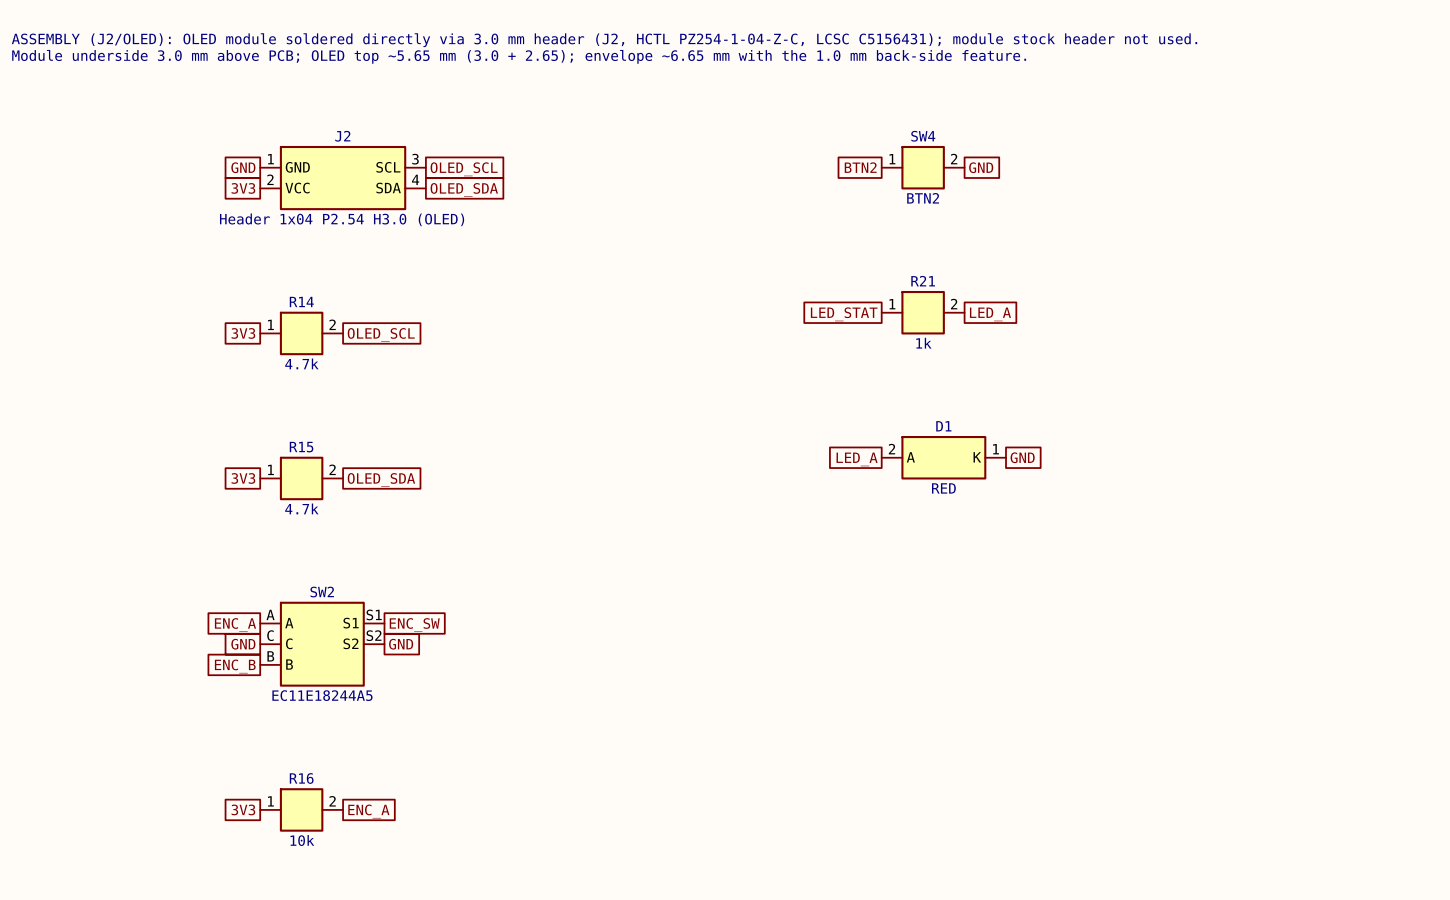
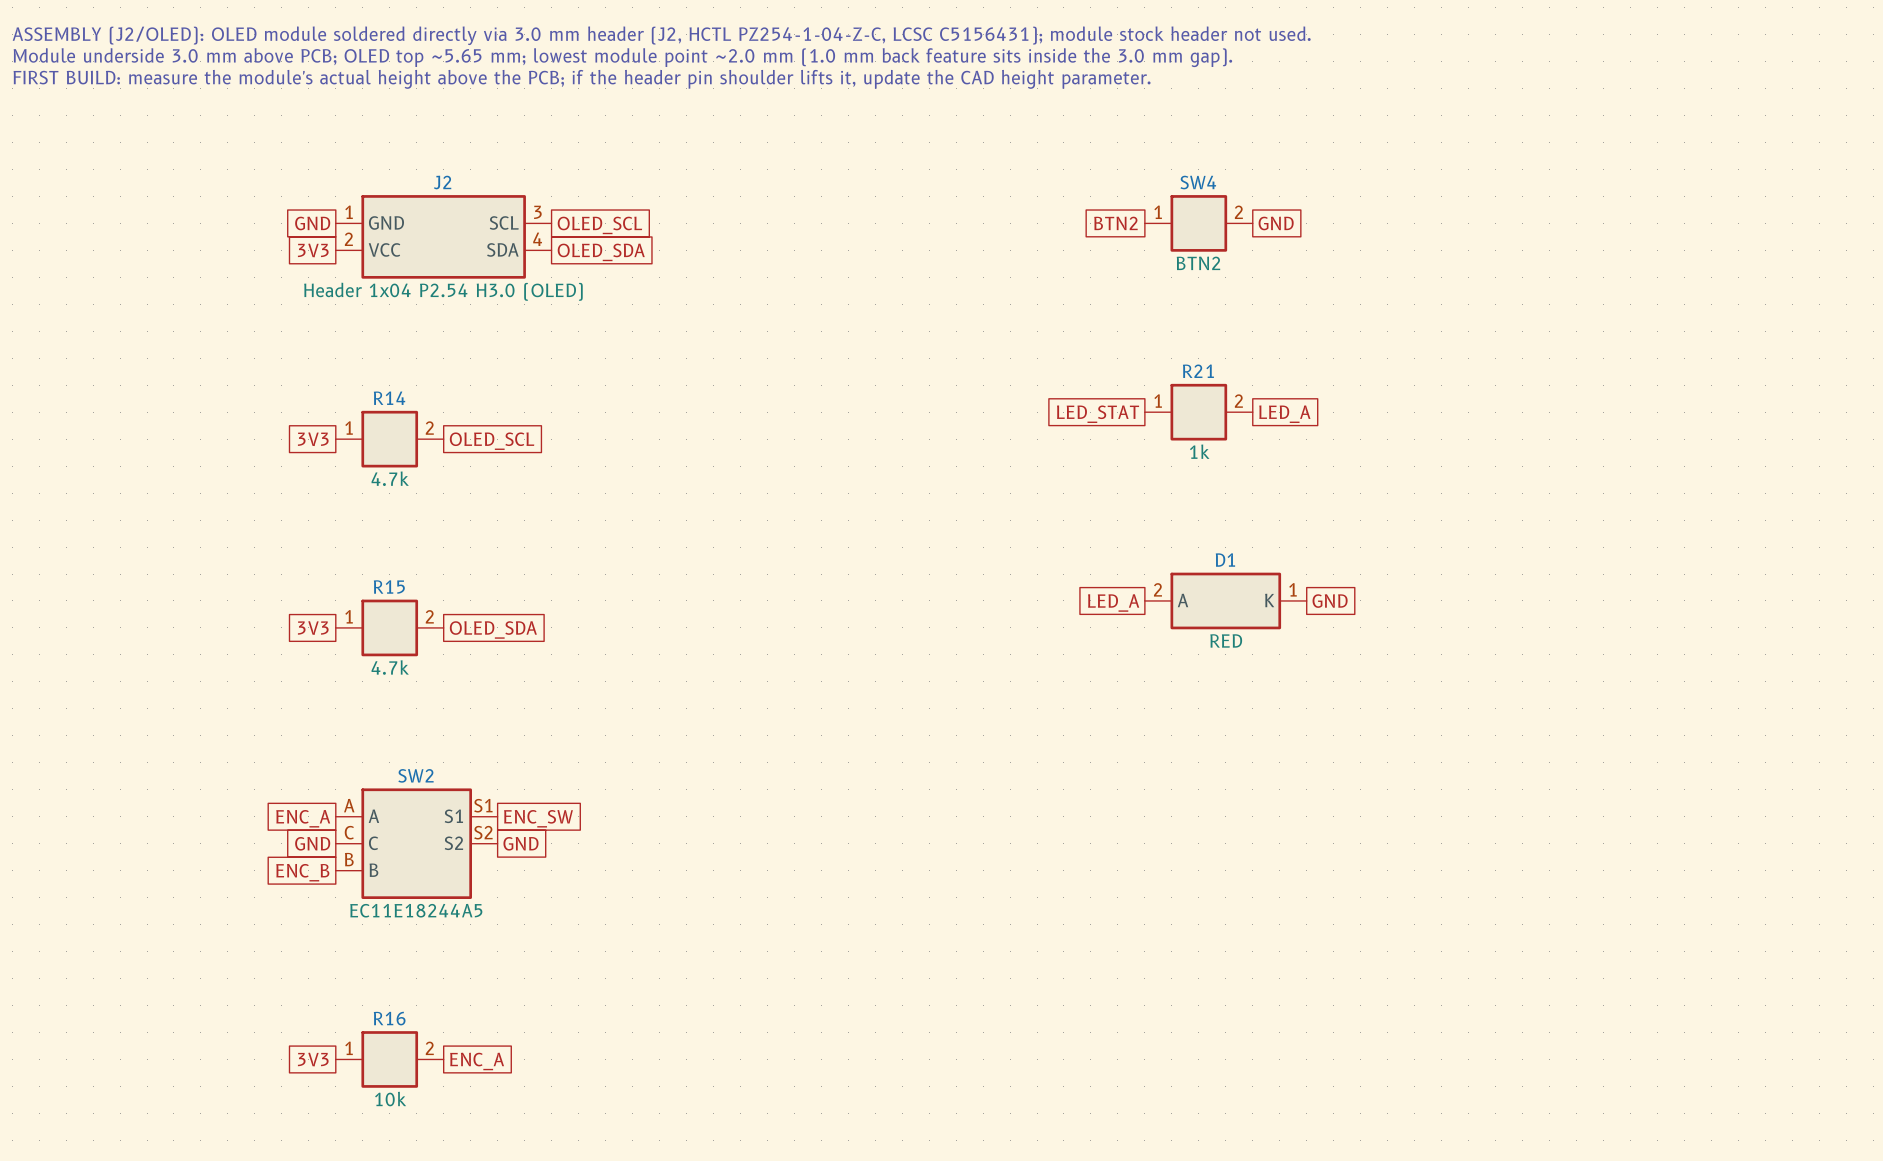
text: none -> ASSEMBLY (J2/OLED): OLED module soldered directly via 3.0 mm header (J2, HCTL PZ254-1-04-Z-C, LCSC C5156431); module stock header not used. (661, 35)
text: ASSEMBLY (J2/OLED): OLED module soldered directly via 3.0 mm header (J2, HCTL PZ254-1-04-Z-C, LCSC C5156431); module stock header not used. (604, 40) -> Module underside 3.0 mm above PCB; OLED top ~5.65 mm; lowest module point ~2.0 mm (1.0 mm back feature sits inside the 3.0 mm gap). (622, 57)
text: Module underside 3.0 mm above PCB; OLED top ~5.65 mm (3.0 + 2.65); envelope ~6.65 mm with the 1.0 mm back-side feature. (519, 56) -> FIRST BUILD: measure the module's actual height above the PCB; if the header pin shoulder lifts it, update the CAD height parameter. (582, 79)

